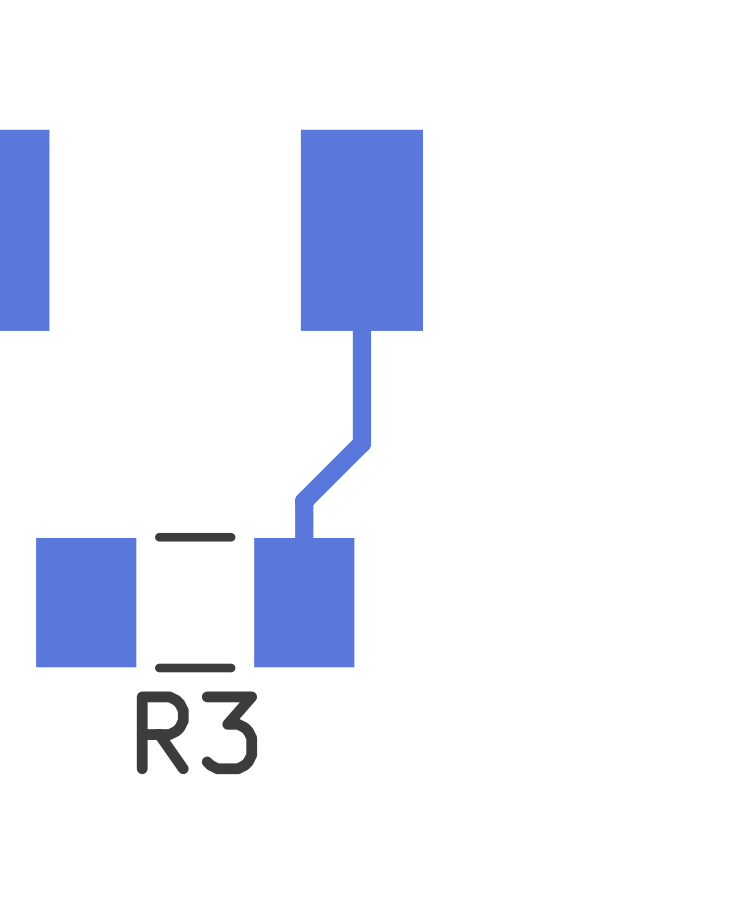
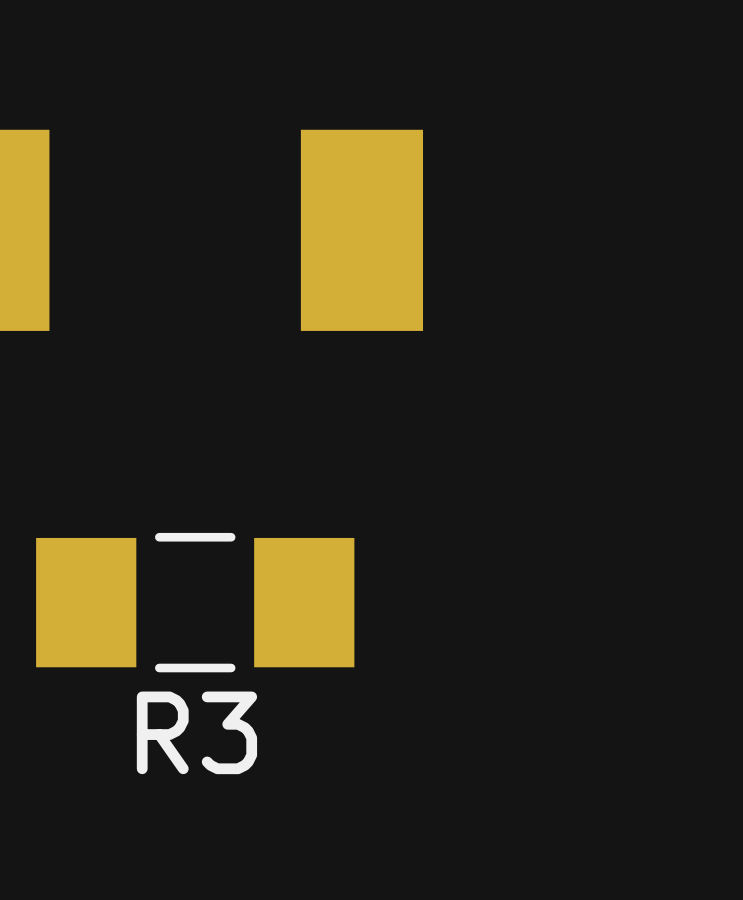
track: (361, 230) (361, 443) (304, 501) (304, 602) -> none

